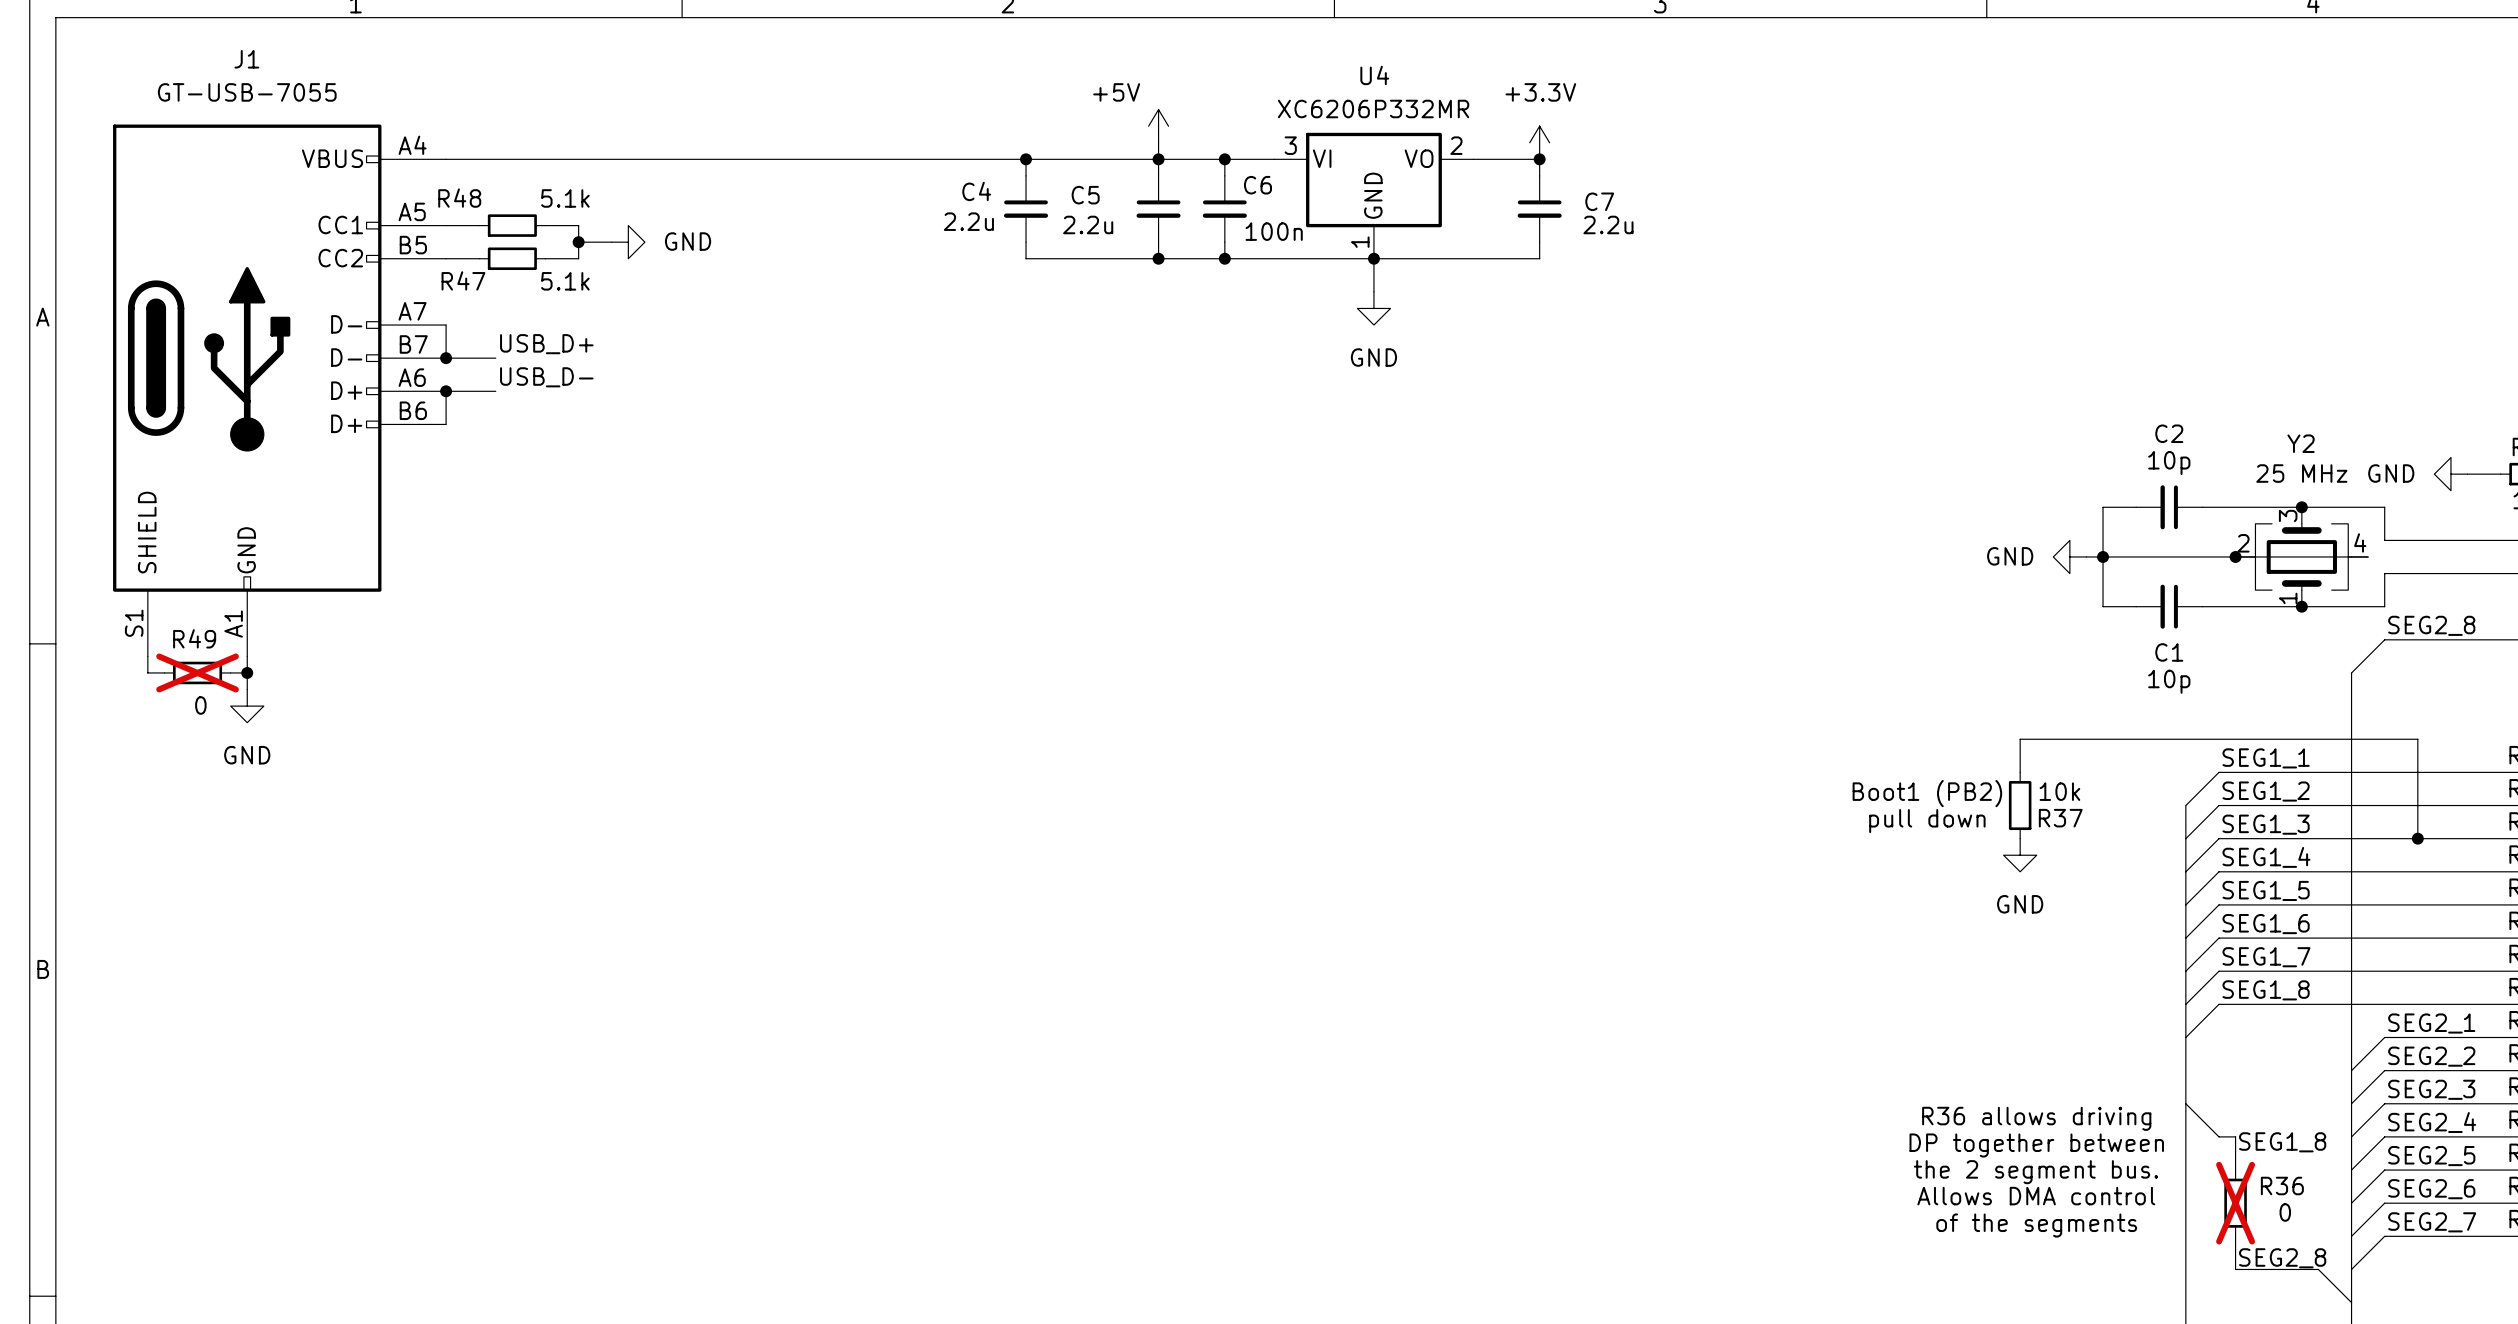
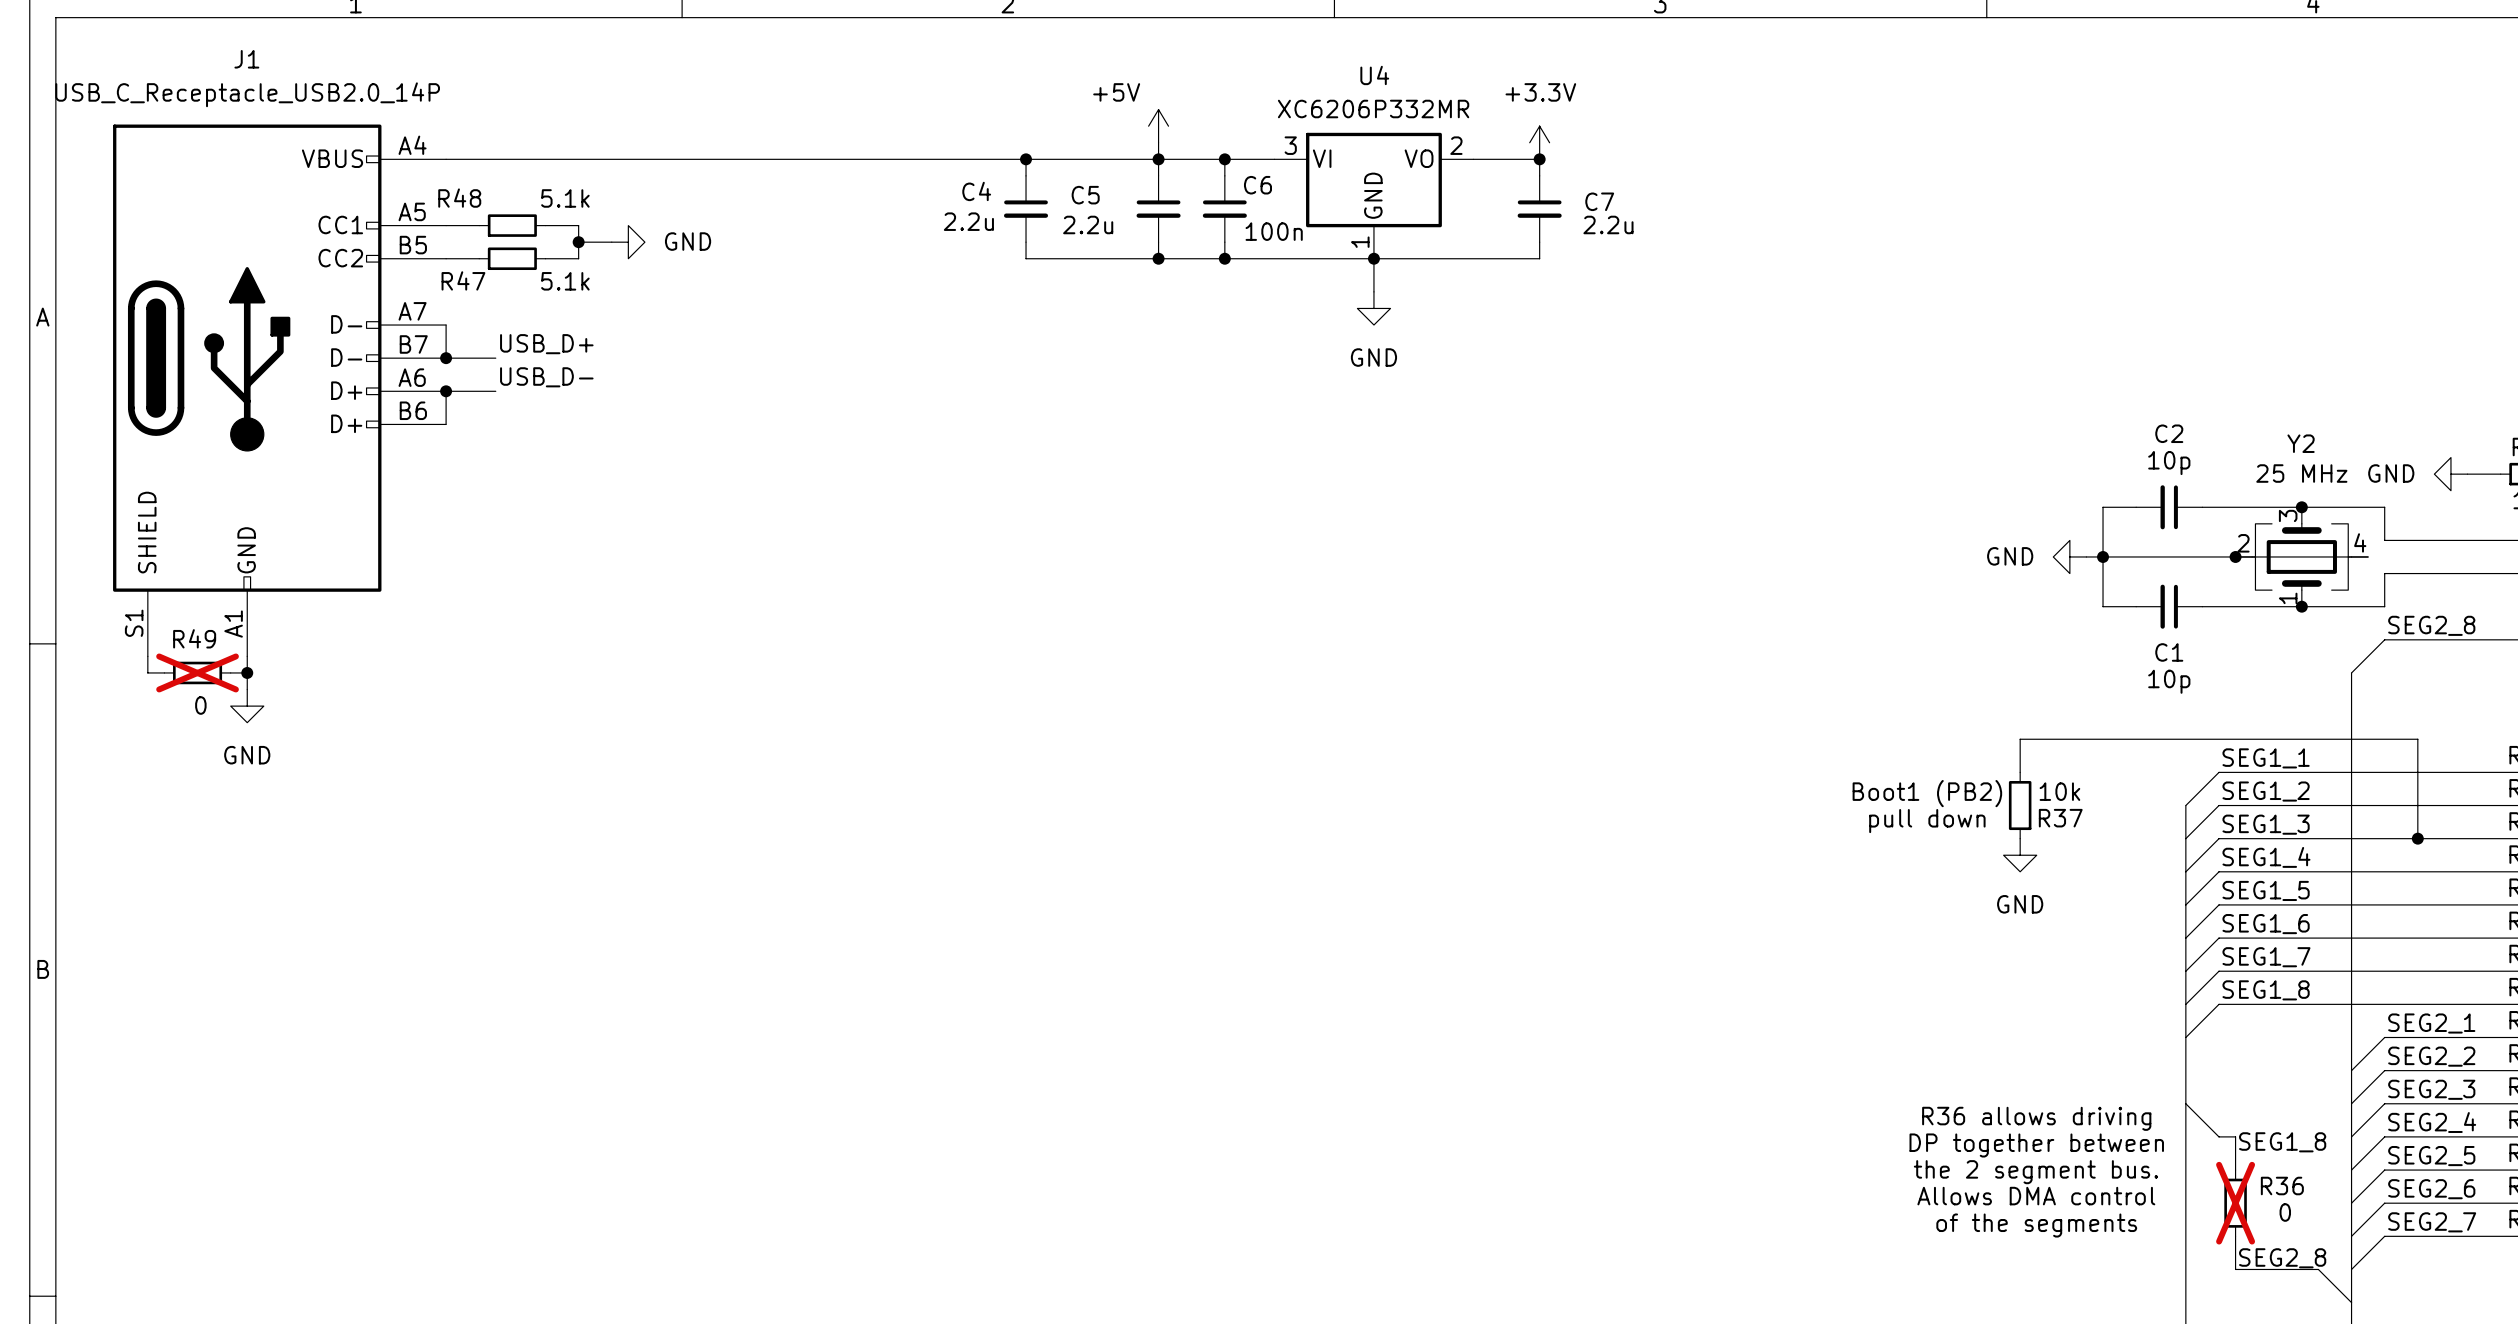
J1 value: GT-USB-7055 (247, 92) -> USB_C_Receptacle_USB2.0_14P (247, 94)

